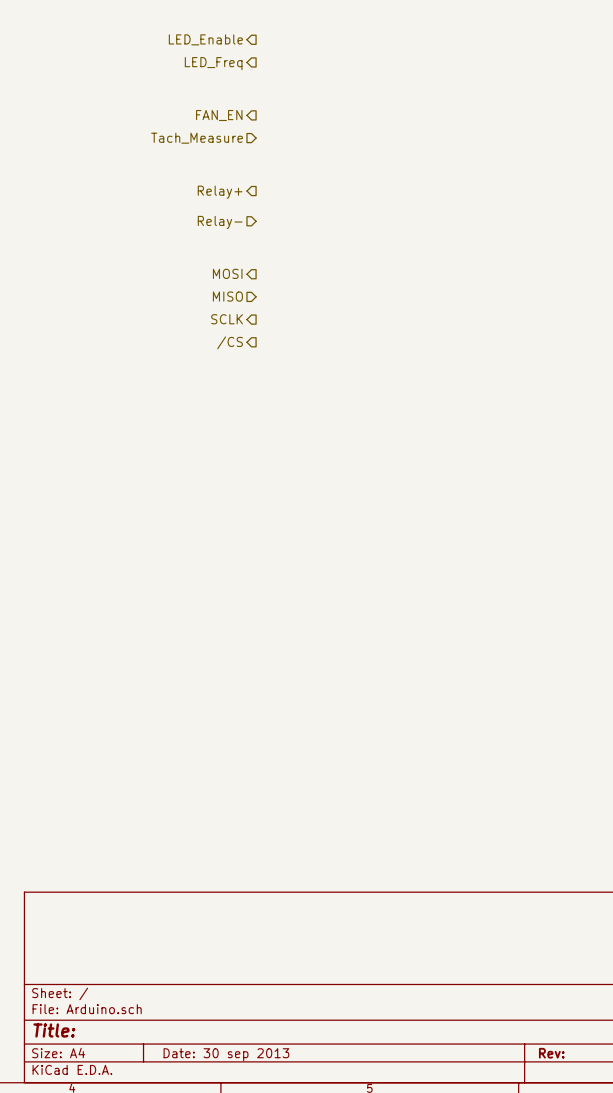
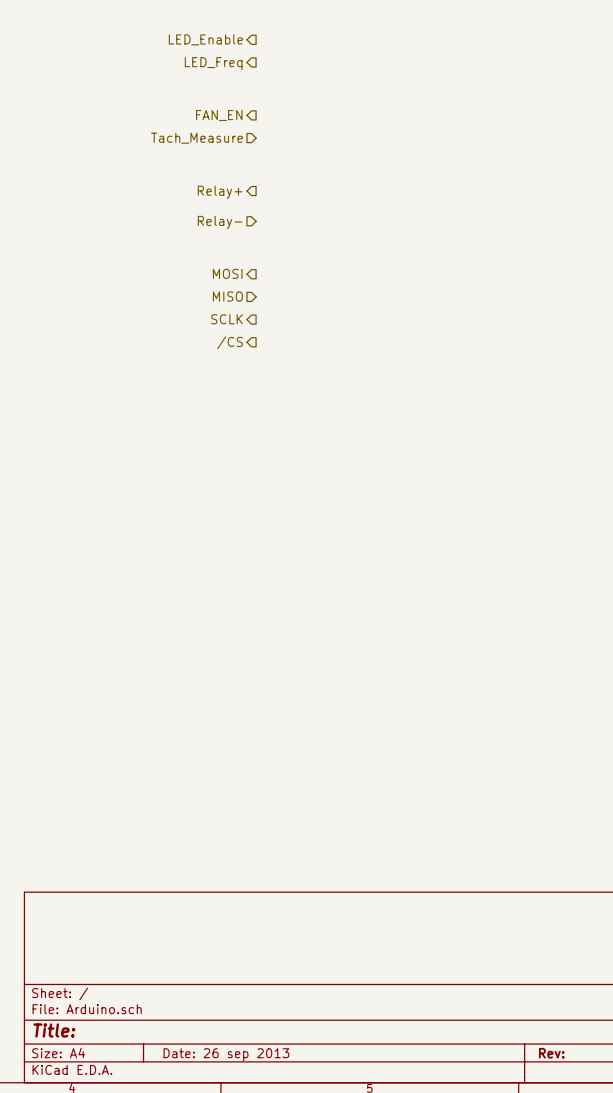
title block: Date: 30 sep 2013 (226, 1054) -> Date: 26 sep 2013 (226, 1054)

